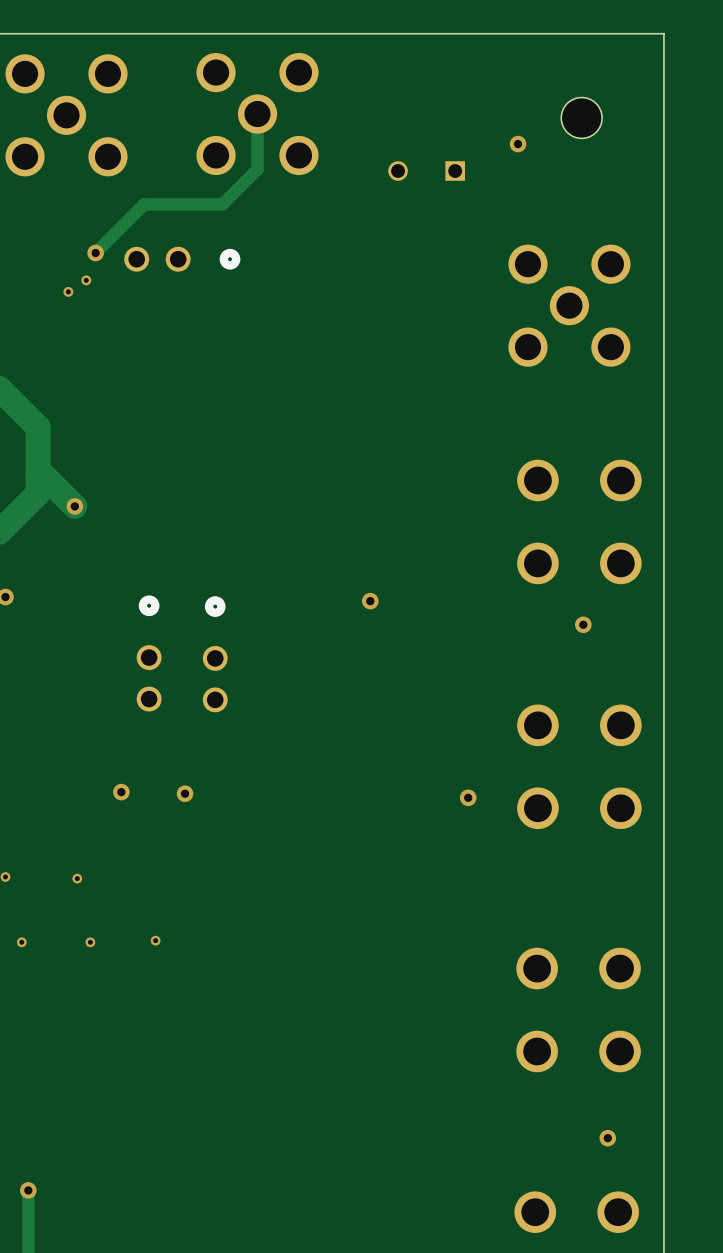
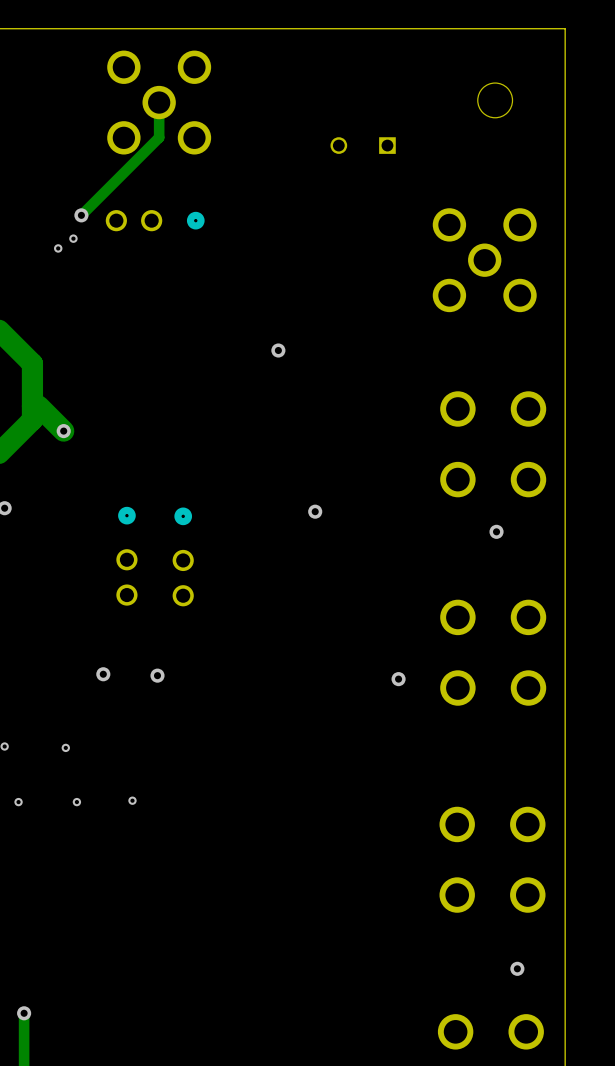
track: (257, 114) (257, 169) (222, 204) (144, 204) -> (159, 102) (159, 137) (122, 174)
part: (257, 114) -> none
part: (66, 115) -> none
part: none -> (159, 102)
via: (518, 144) -> none
via: none -> (278, 350)

